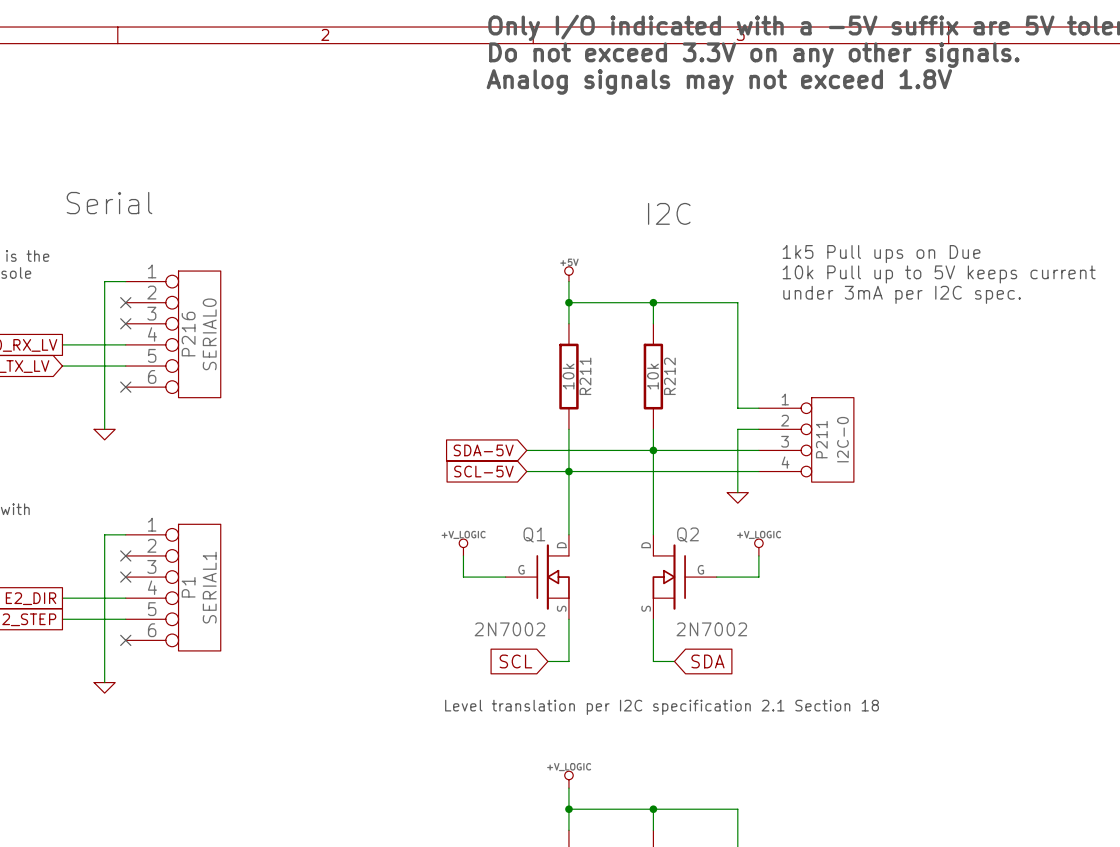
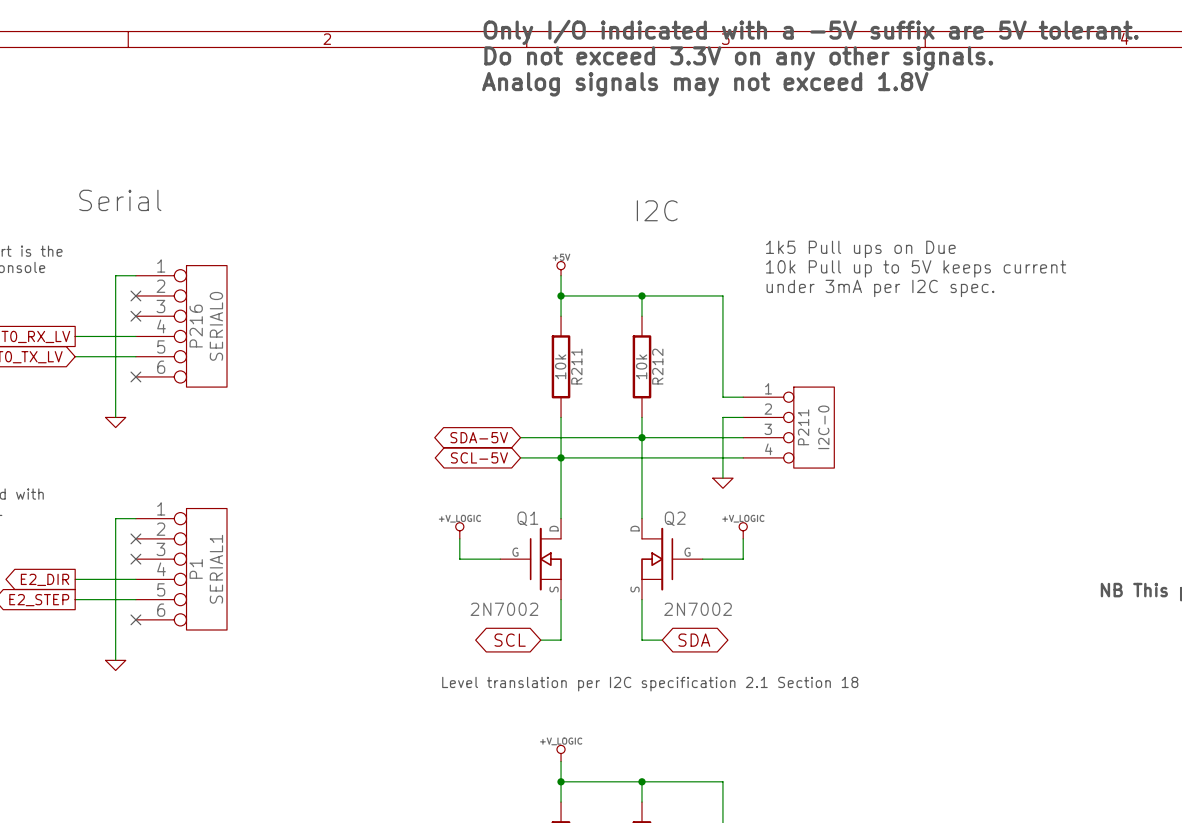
global label shape: input (483, 450) -> bidirectional (479, 437)
global label shape: input (483, 471) -> bidirectional (479, 457)
global label shape: input (515, 661) -> bidirectional (510, 640)
global label shape: input (707, 661) -> bidirectional (694, 640)

